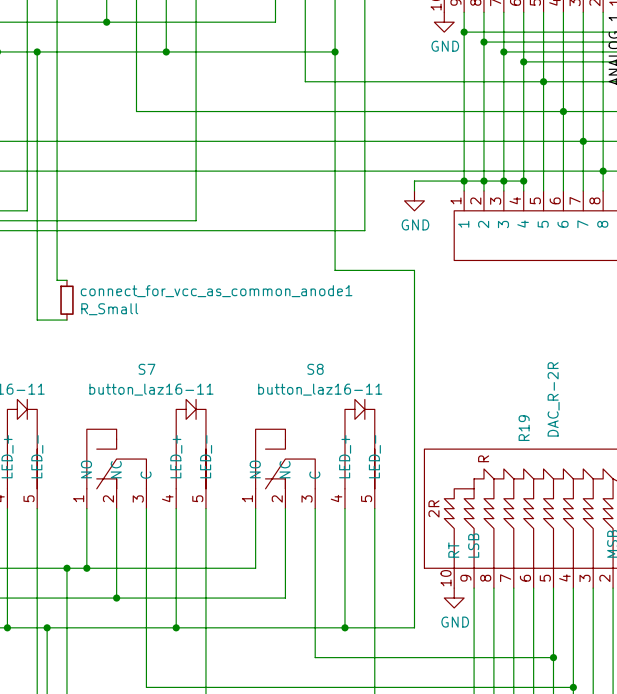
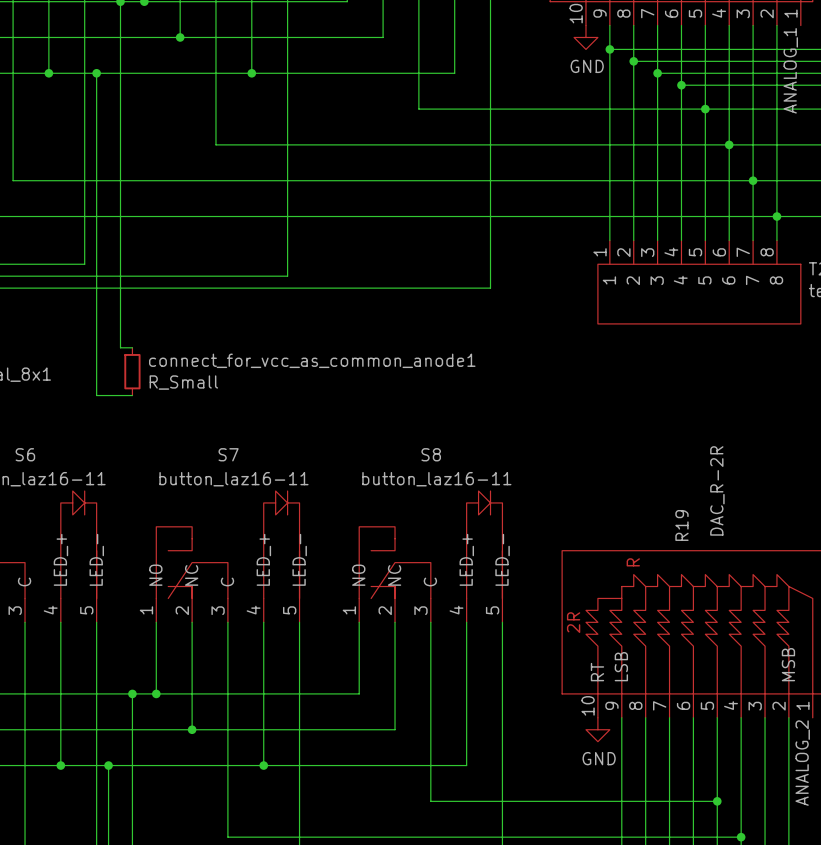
wire: (335, 51) (335, 270) (414, 270) (414, 627) (344, 627) -> none
junction: (335, 51) -> none
junction: (464, 181) -> none
junction: (483, 181) -> none
junction: (503, 181) -> none
wire: (523, 181) (414, 181) (414, 190) -> none
junction: (523, 181) -> none
power symbol: GND (414, 200) -> none
junction: (344, 627) -> none

